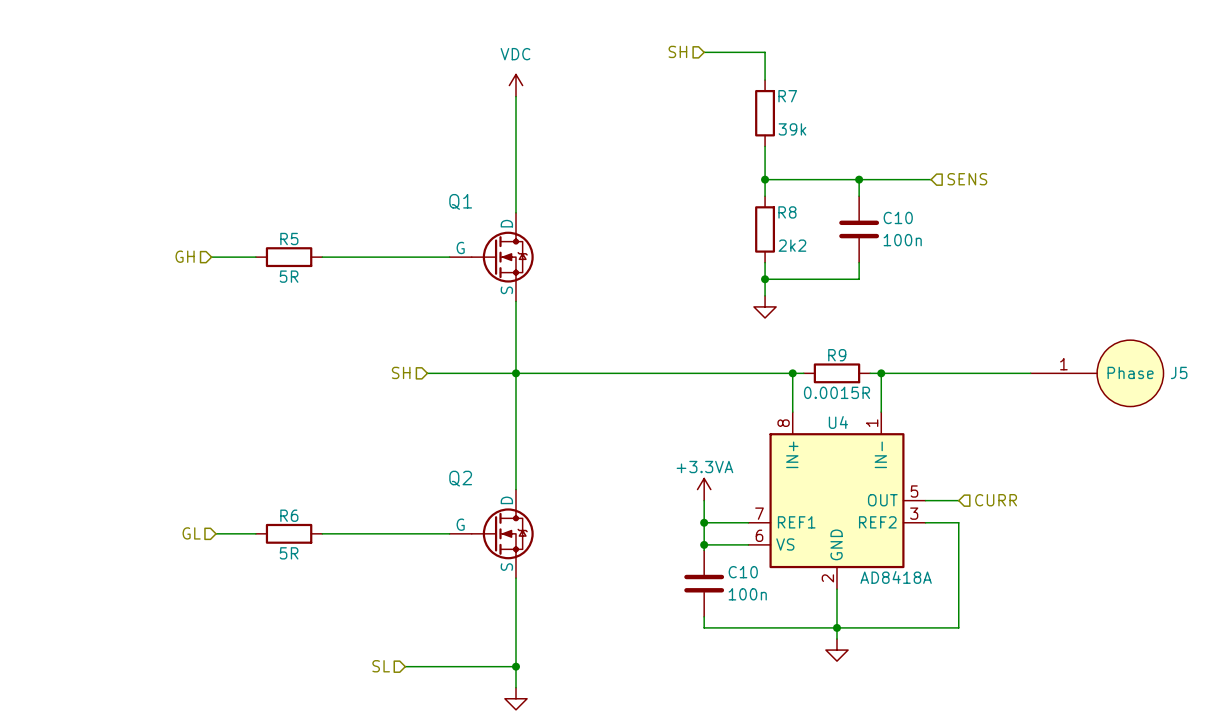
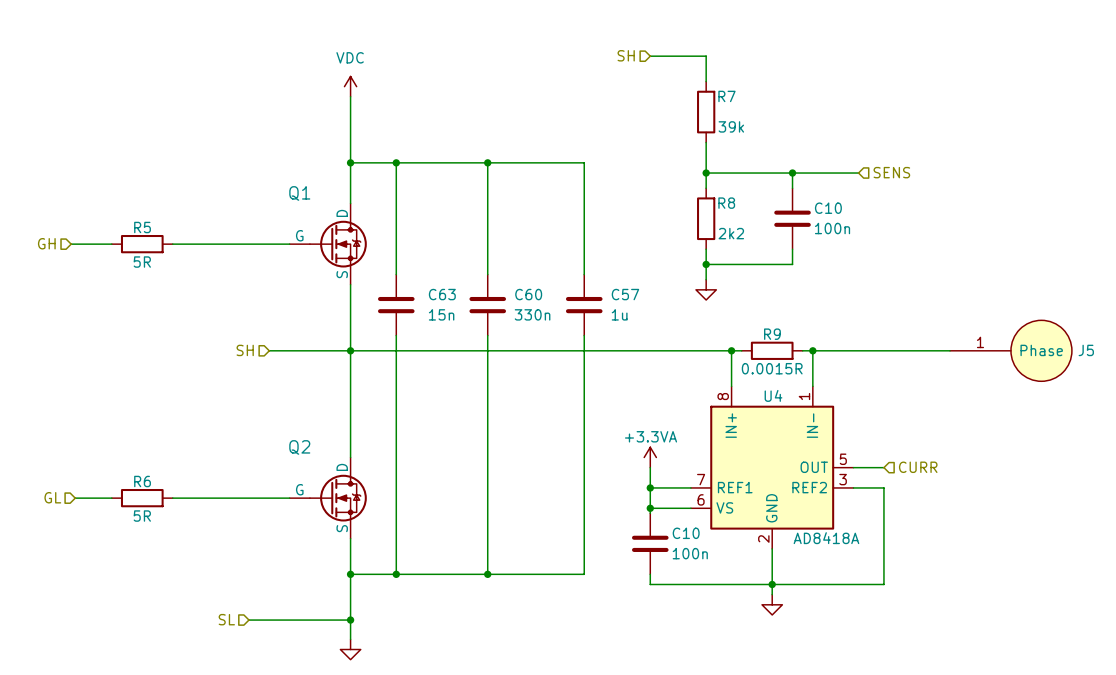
power symbol position: VDC (516, 85) -> VDC (350, 86)
wire: (516, 96) (516, 212) -> (350, 96) (350, 203)
wire: none -> (350, 162) (584, 162) (584, 274)
junction: none -> (350, 162)
wire: none -> (396, 162) (396, 274)
junction: none -> (396, 162)
wire: none -> (487, 162) (487, 274)
junction: none -> (487, 162)
hierarchical label position: GH (185, 256) -> GH (46, 243)
wire: none -> (71, 244) (111, 244)
wire: none -> (172, 244) (198, 244)
wire: none -> (238, 244) (289, 244)
R5 position: (289, 257) -> (142, 244)
wire: (322, 257) (449, 257) -> none
Q1 position: (491, 257) -> (328, 244)
wire: (516, 301) (516, 489) -> (350, 284) (350, 457)
C63: none -> 15n (396, 305)
C60: none -> 330n (487, 305)
C57: none -> 1u (584, 305)
wire: none -> (396, 335) (396, 574)
wire: none -> (487, 335) (487, 574)
wire: none -> (584, 335) (584, 574) (350, 574)
hierarchical label position: SH (401, 372) -> SH (245, 350)
wire: none -> (269, 350) (396, 350)
junction: none -> (350, 350)
junction: (516, 373) -> none
wire: none -> (75, 498) (111, 498)
wire: none -> (172, 498) (202, 498)
hierarchical label position: GL (191, 533) -> GL (52, 497)
wire: none -> (238, 498) (289, 498)
R6 position: (289, 533) -> (142, 498)
wire: (322, 533) (449, 533) -> none
Q2 position: (491, 533) -> (328, 498)
wire: none -> (350, 538) (350, 574)
wire: (516, 578) (516, 687) -> none
wire: none -> (350, 574) (350, 639)
junction: none -> (350, 574)
junction: none -> (396, 574)
junction: none -> (487, 574)
junction: none -> (350, 620)
hierarchical label position: SL (381, 666) -> SL (226, 619)
wire: (405, 666) (516, 666) -> (248, 620) (350, 620)
junction: (516, 666) -> none
power symbol position: (516, 698) -> (350, 649)

